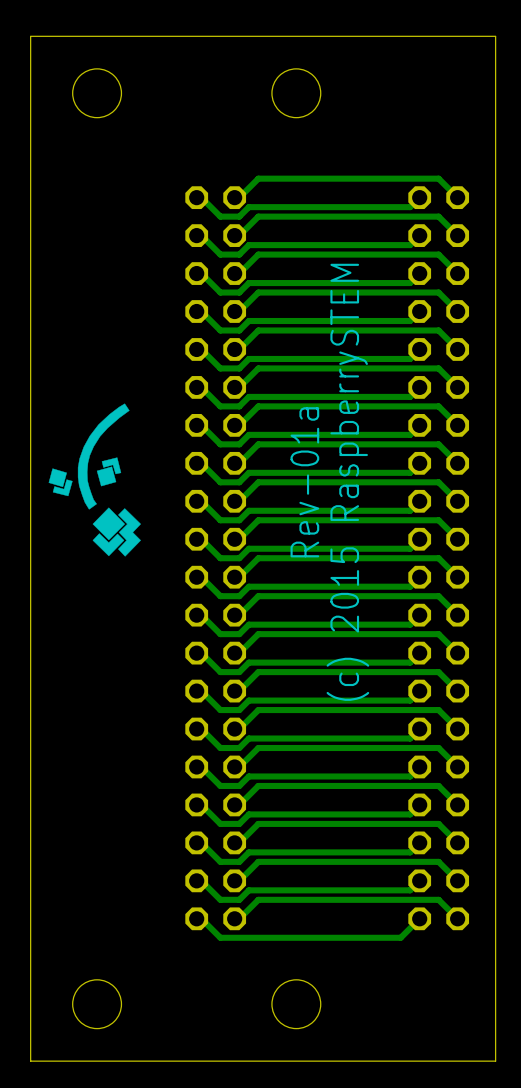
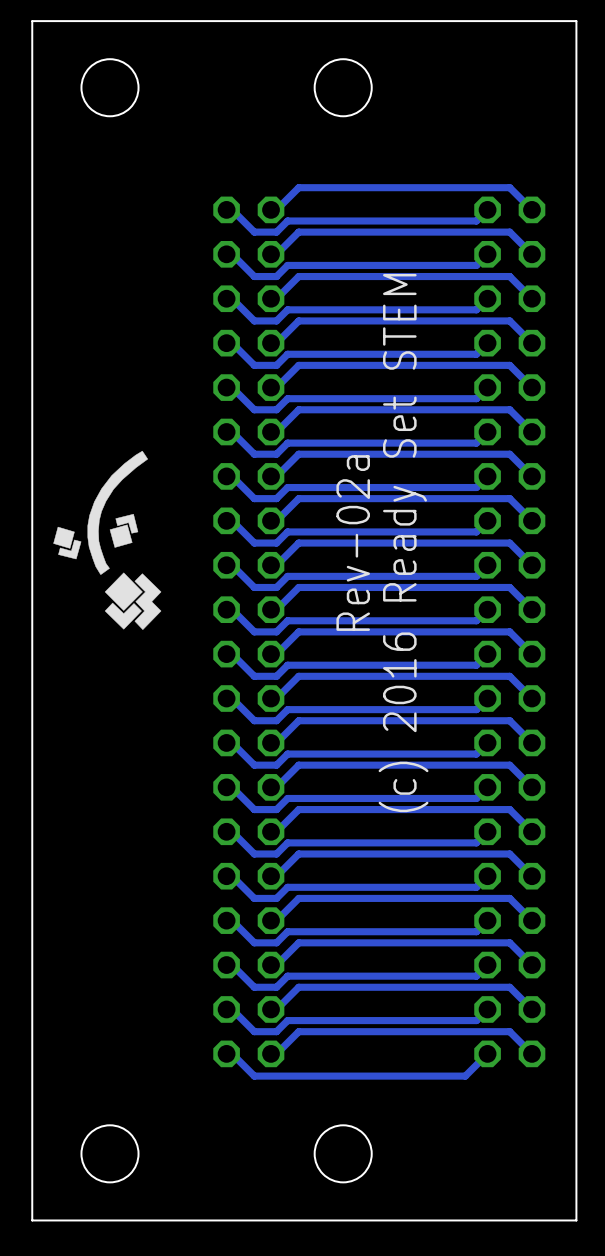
text: Rev-01a (304, 482) -> Rev-02a (353, 543)
text: (c) 2015 RaspberrySTEM (347, 482) -> (c) 2016 Ready Set STEM (403, 543)

